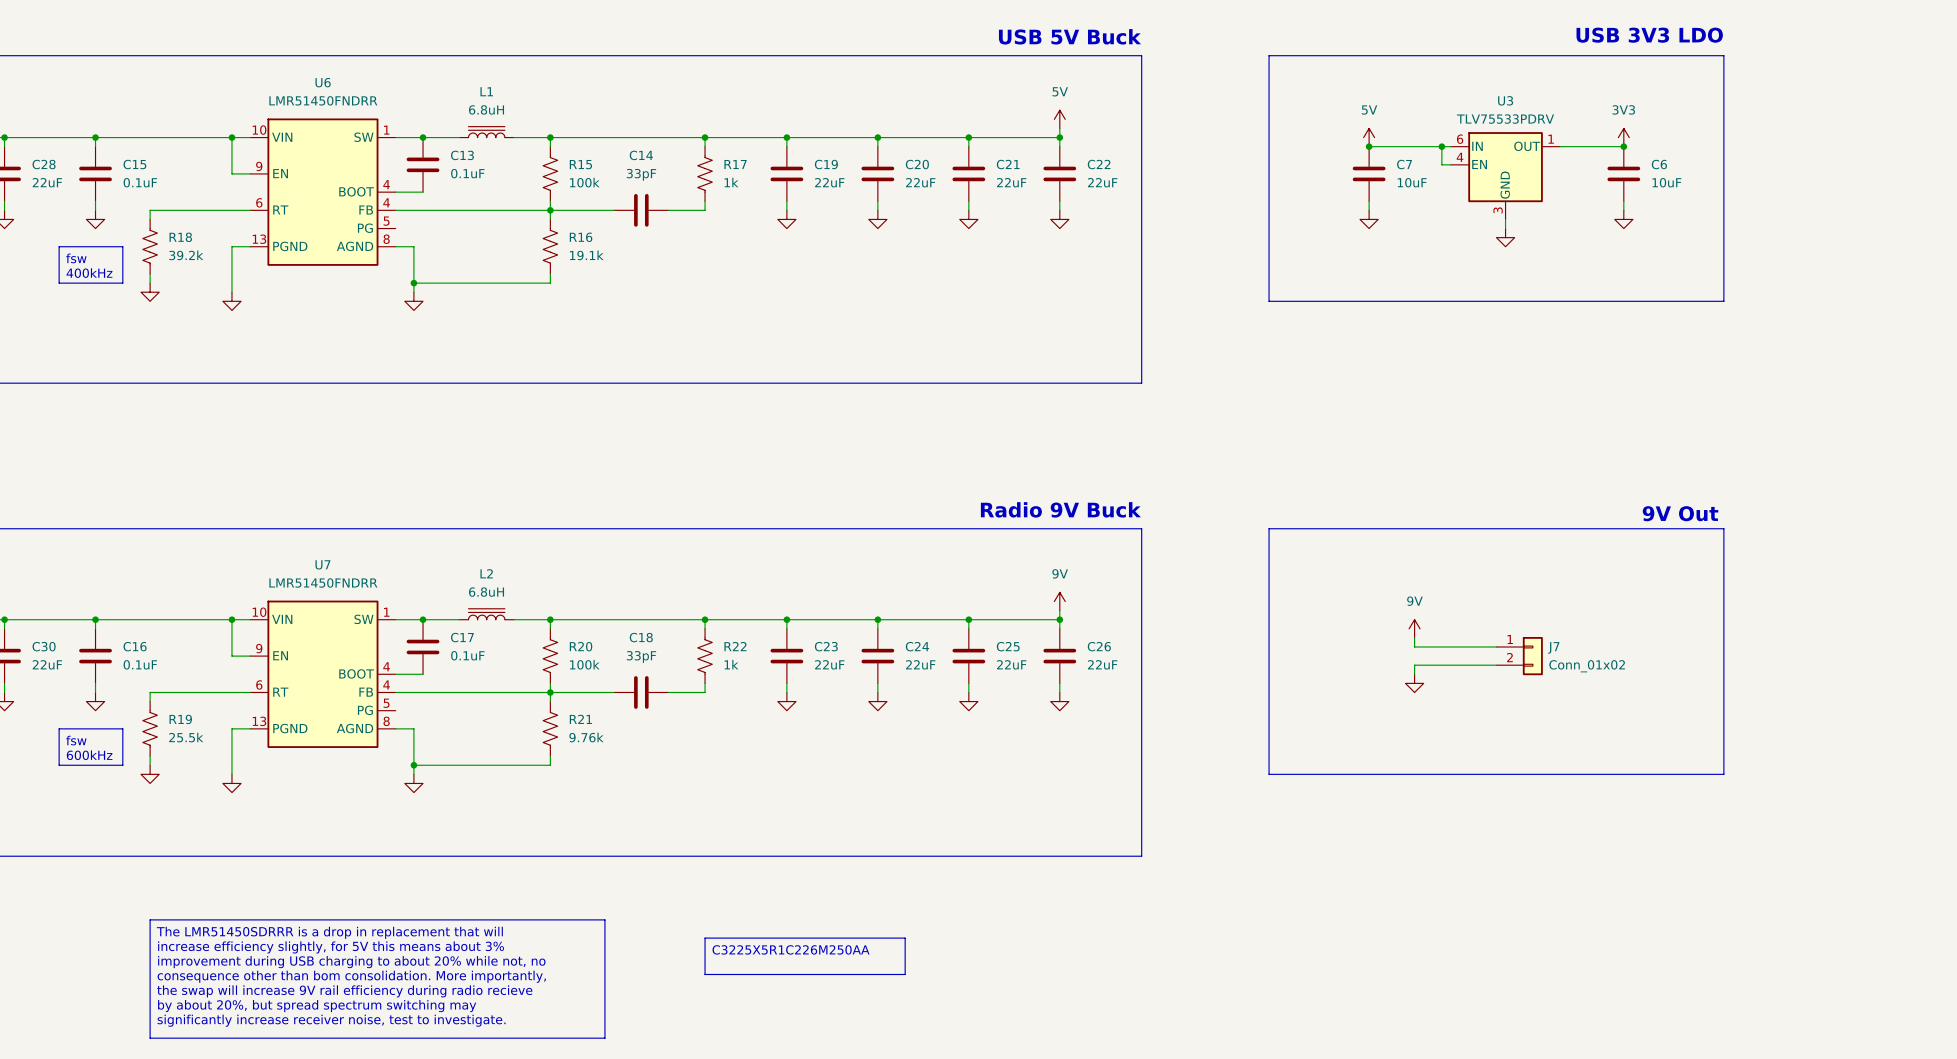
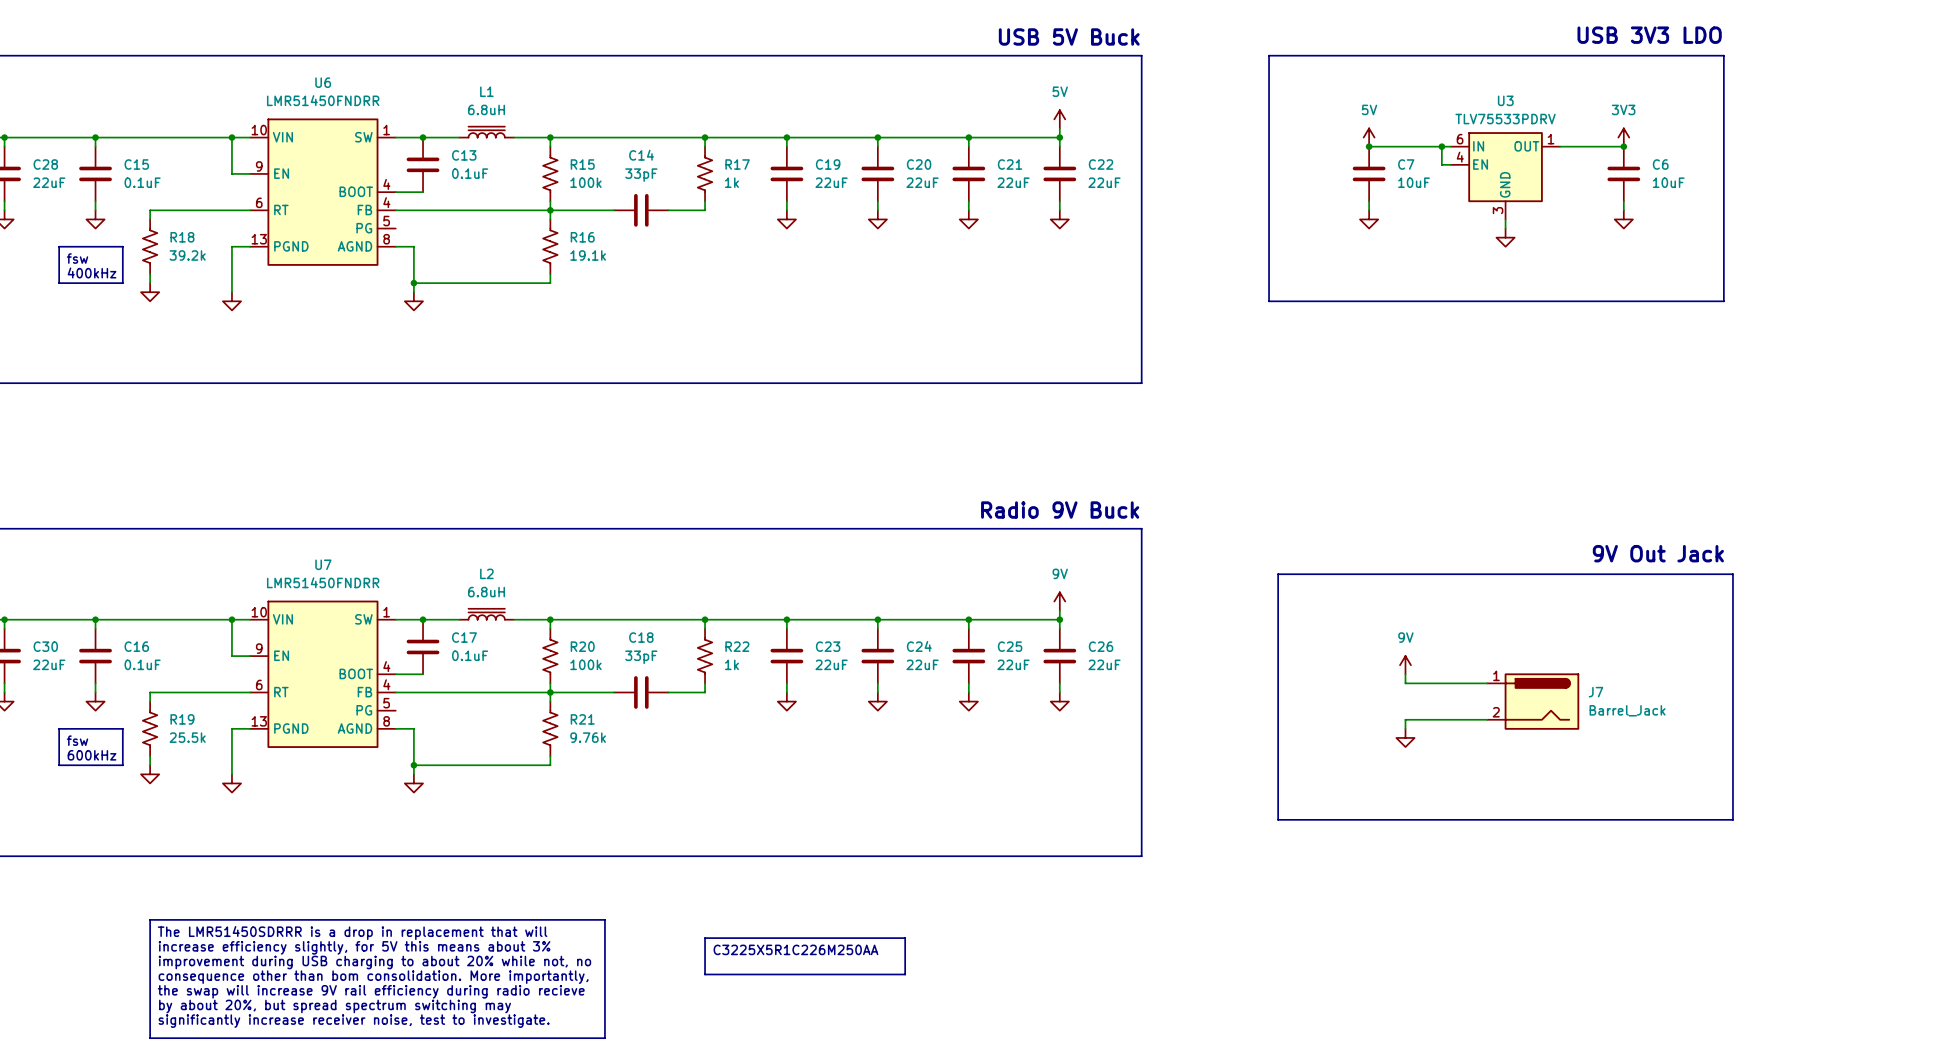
text: 9V Out (1680, 513) -> none
line: (1269, 528) (1723, 528) (1723, 774) (1269, 774) (1269, 528) -> (1278, 574) (1278, 819) (1732, 819) (1732, 574) (1278, 574)
text: none -> 9V Out Jack (1658, 553)
power symbol position: 9V (1414, 628) -> 9V (1405, 665)
J7 symbol: [1496, 636, 1543, 676] -> [1487, 673, 1580, 730]
wire: (1414, 637) (1414, 647) (1496, 647) -> (1405, 674) (1405, 683) (1487, 683)
J7 name position: J7 (1553, 647) -> J7 (1595, 692)
wire: (1496, 665) (1414, 665) (1414, 674) -> (1487, 719) (1405, 719) (1405, 728)
J7 value: Conn_01x02 (1587, 666) -> Barrel_Jack (1627, 710)
power symbol position: (1414, 683) -> (1405, 737)

